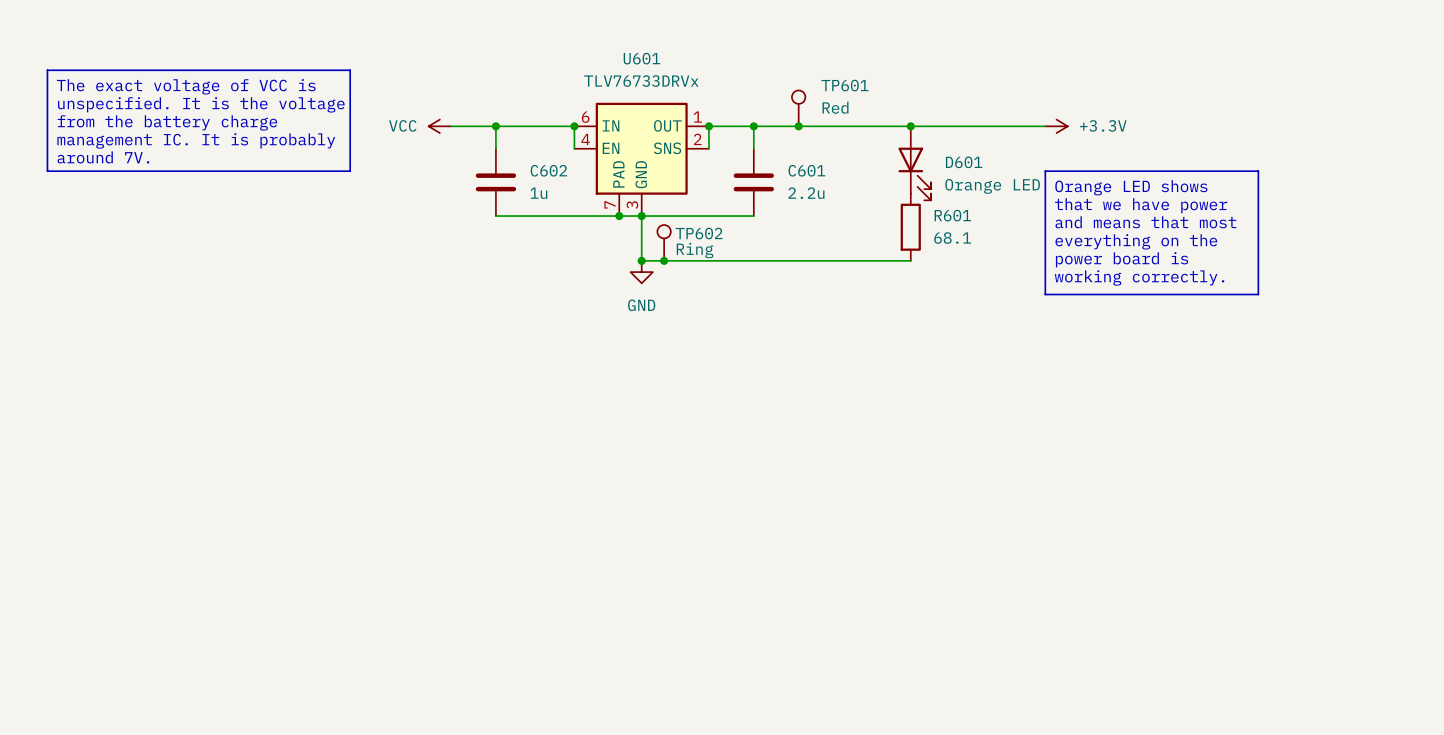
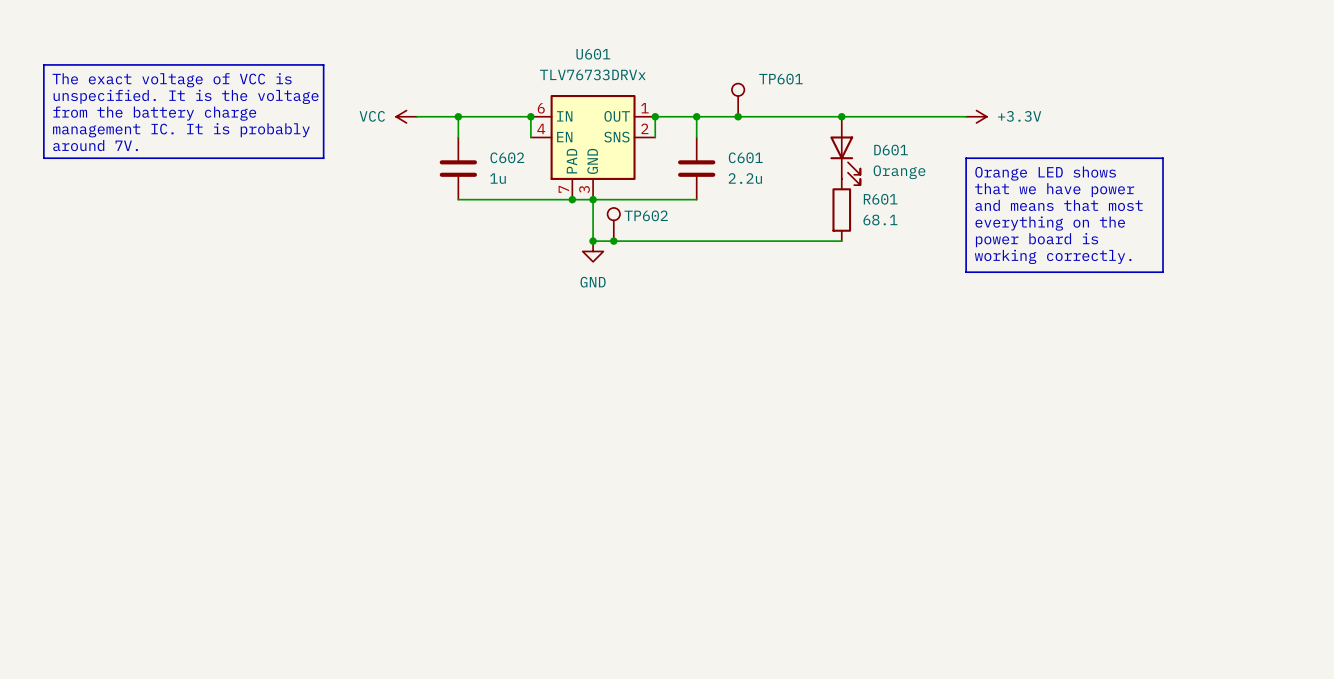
TP601 value: Red (835, 107) -> none
D601 value: Orange LED (992, 186) -> Orange (899, 172)
TP602 value: Ring (695, 250) -> none

